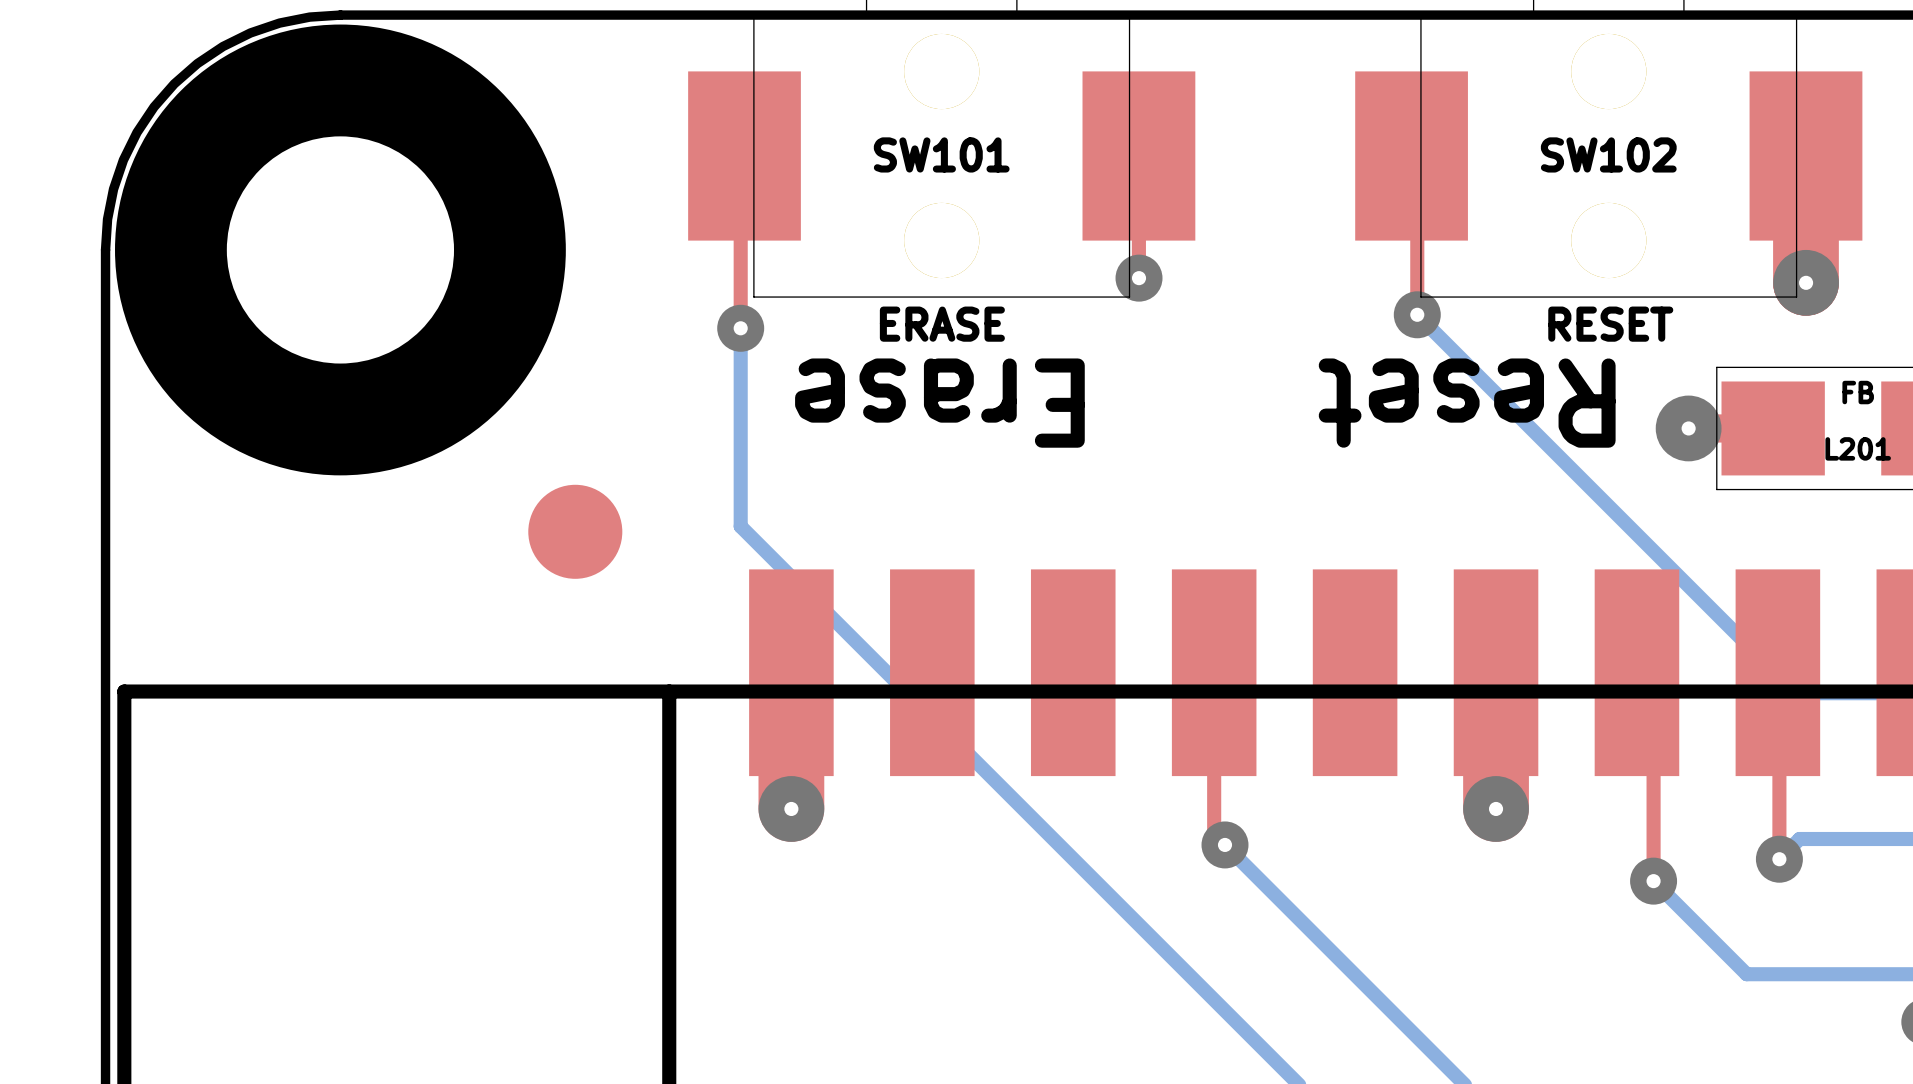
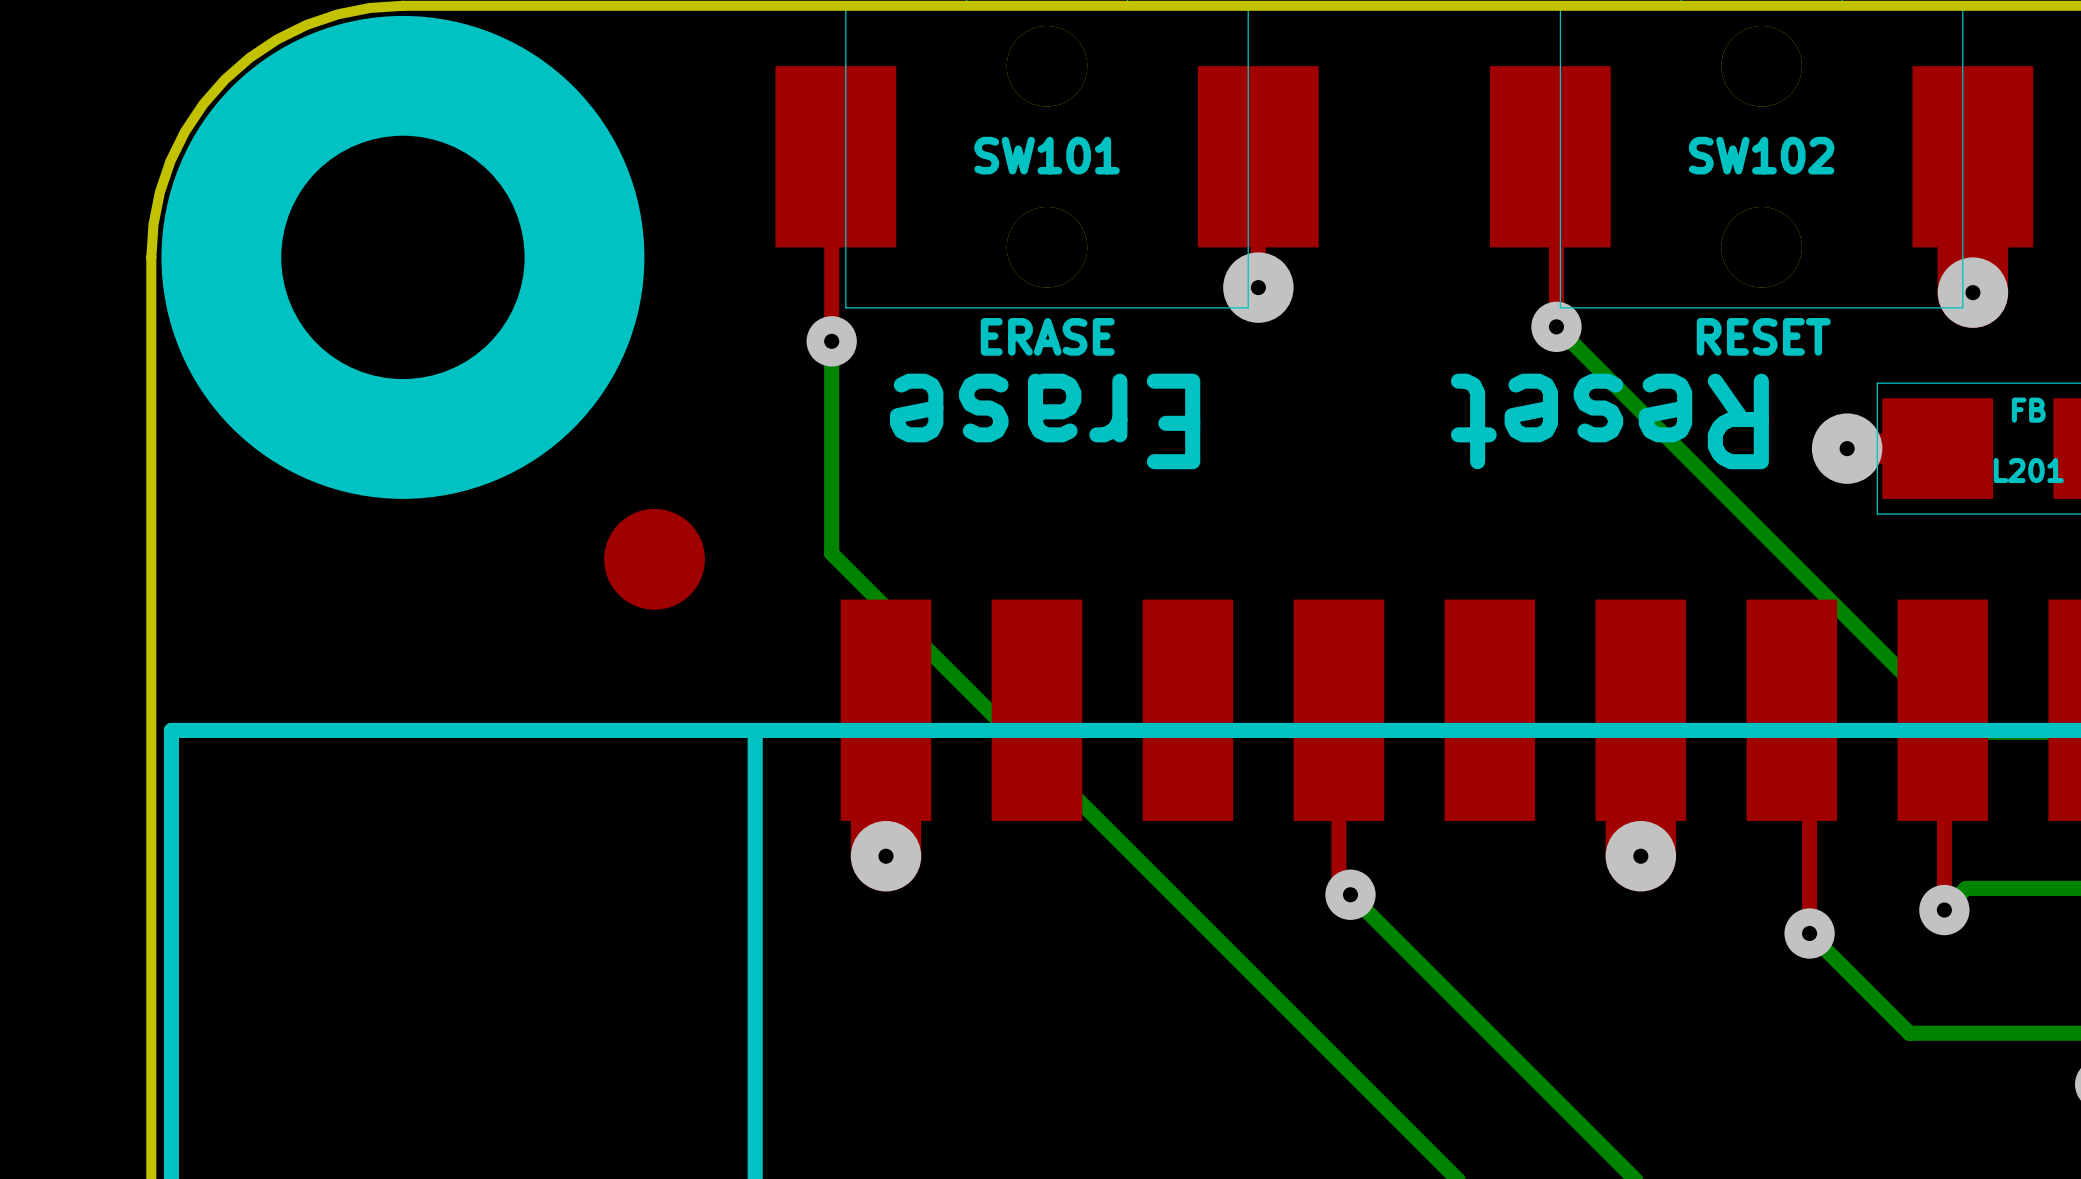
via size: [1115, 254, 1163, 302] -> [1223, 252, 1294, 323]

